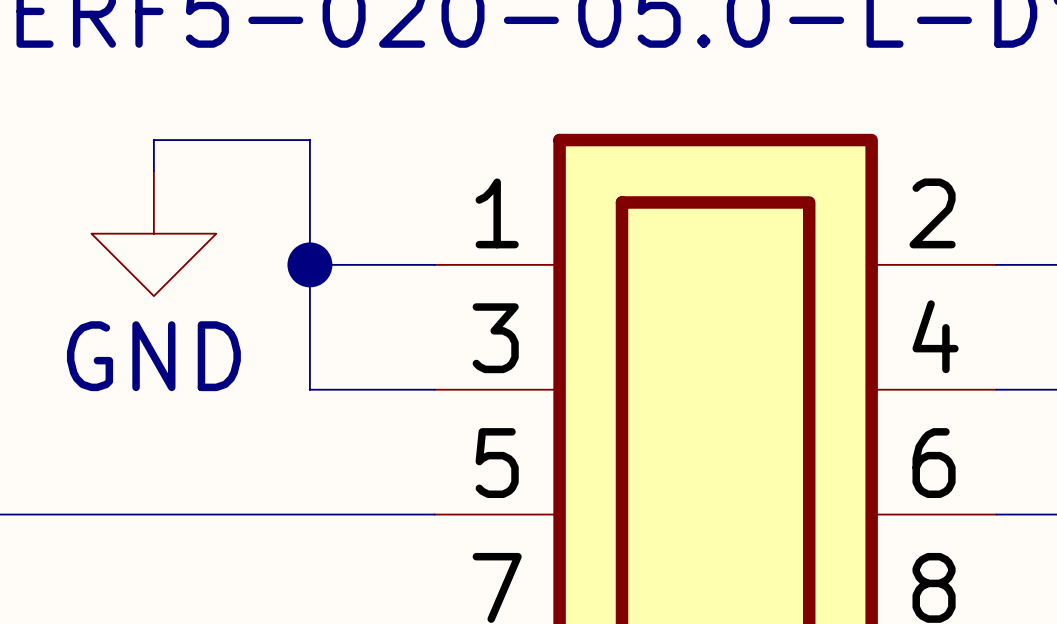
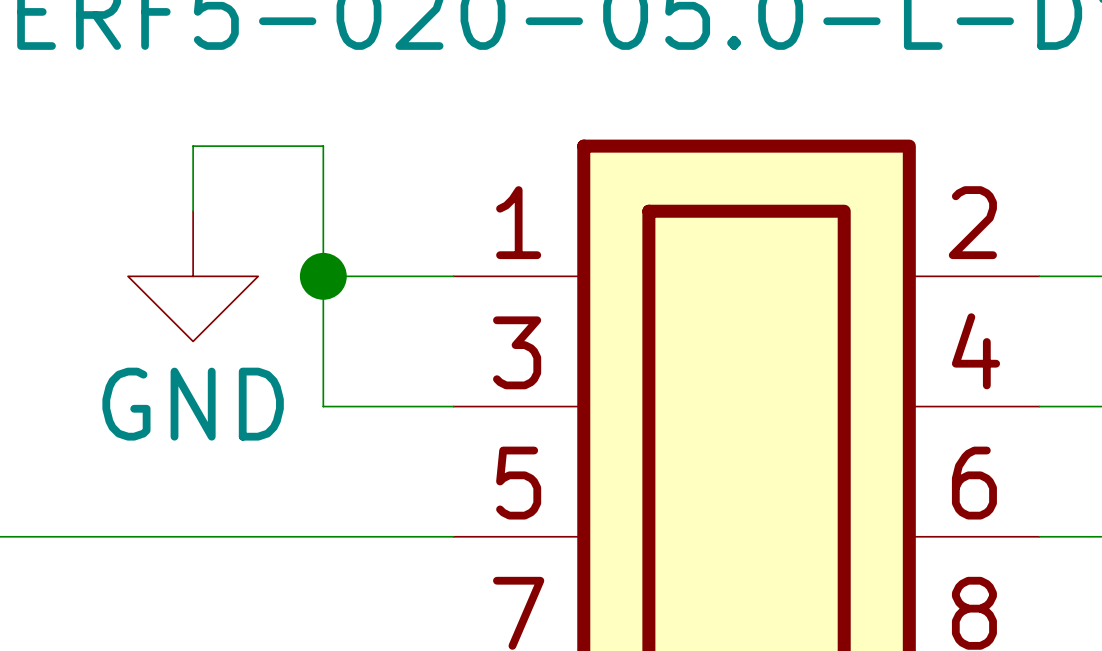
wire: (185, 140) (153, 140) (153, 171) -> (193, 146) (193, 211)
power symbol position: GND (153, 233) -> GND (193, 276)

